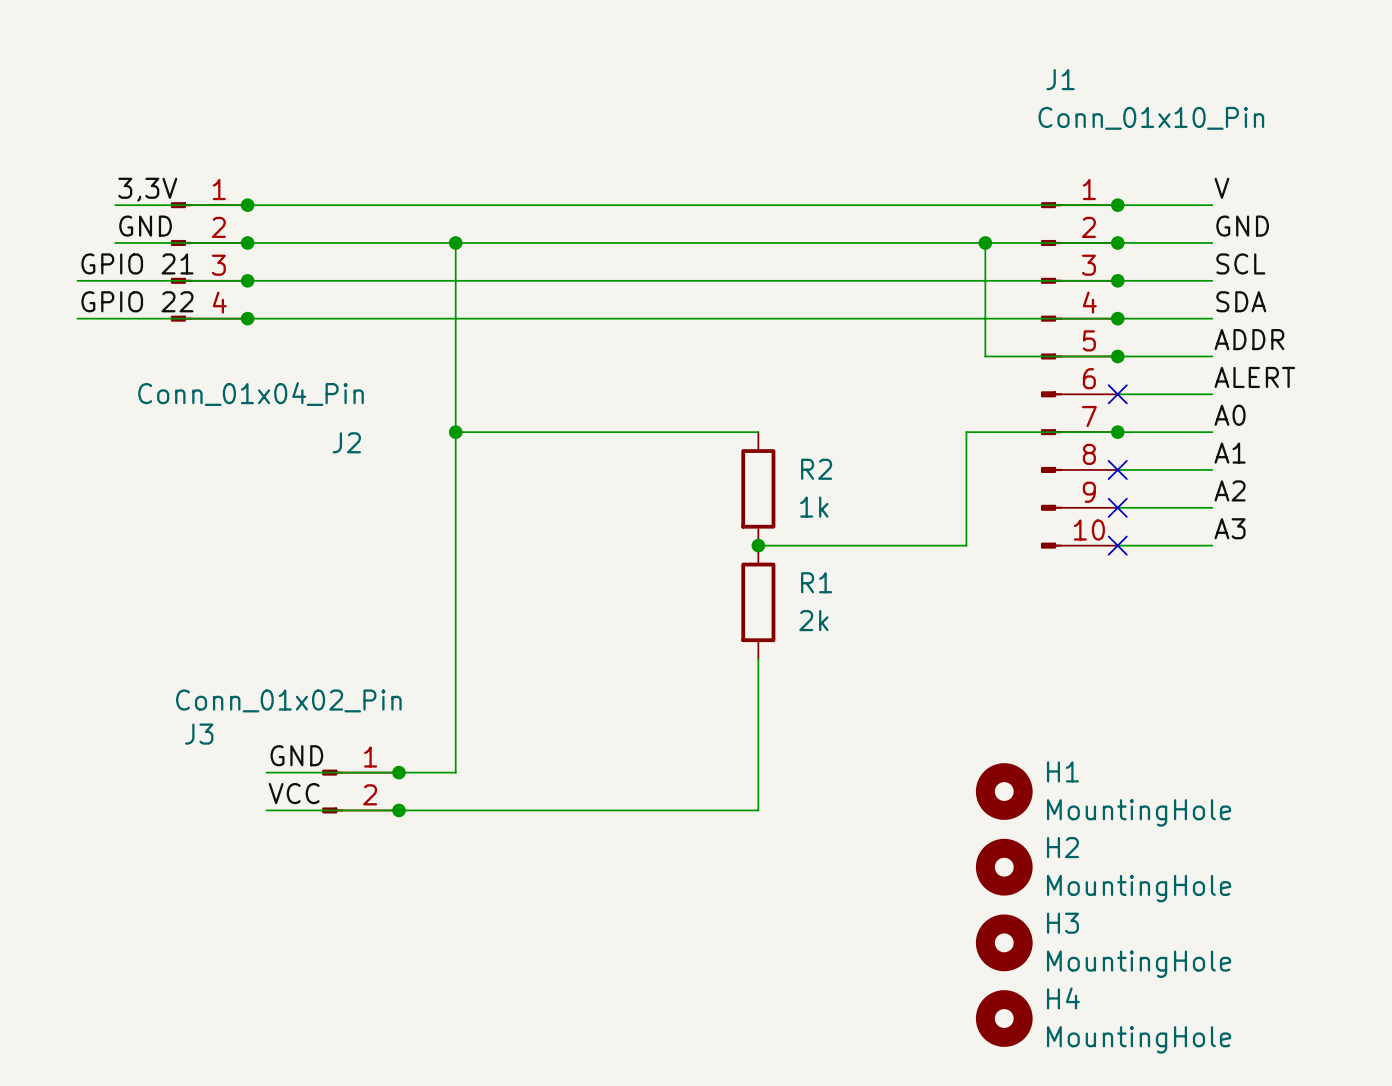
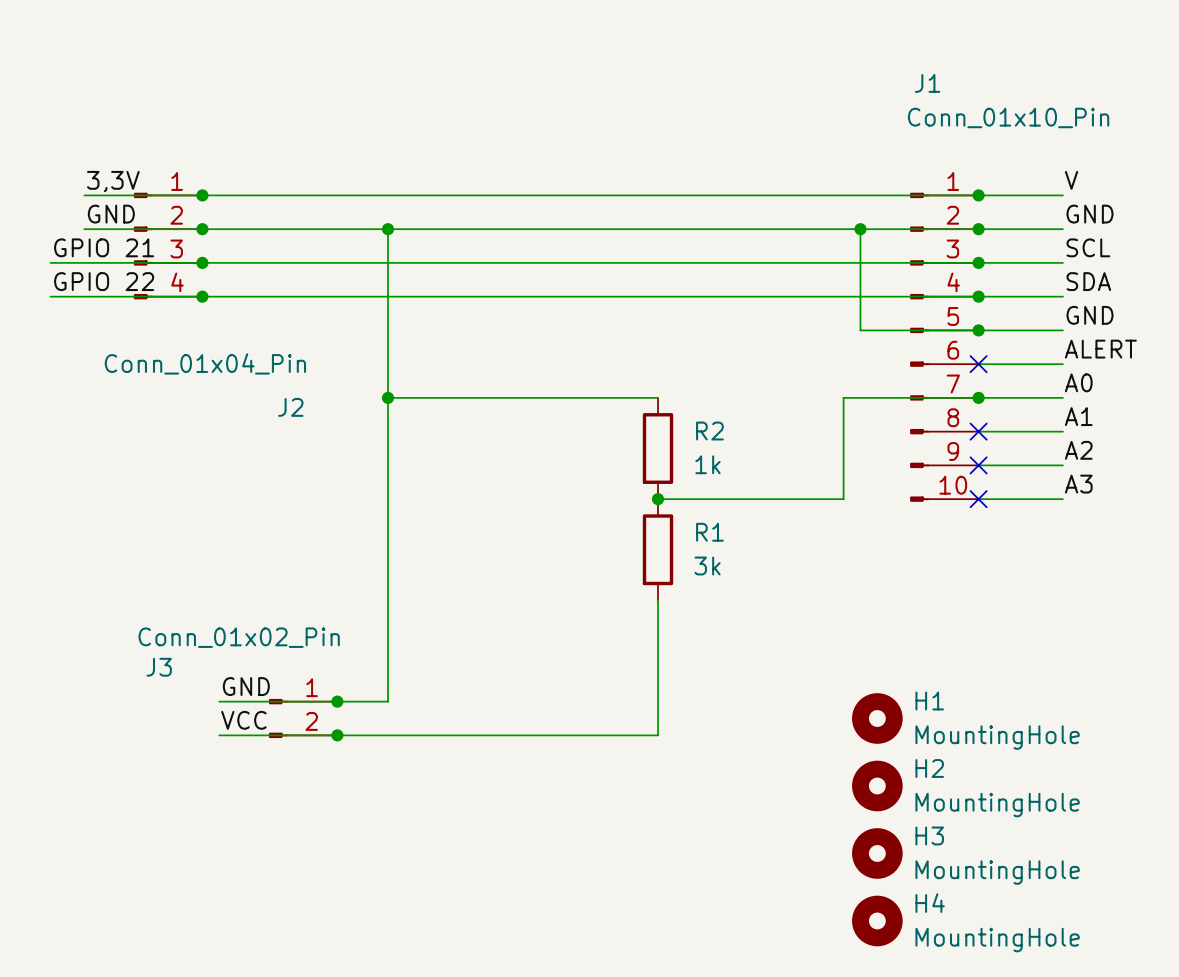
label: ADDR (1249, 339) -> GND (1090, 315)
R1 value: 2k (813, 620) -> 3k (707, 566)

